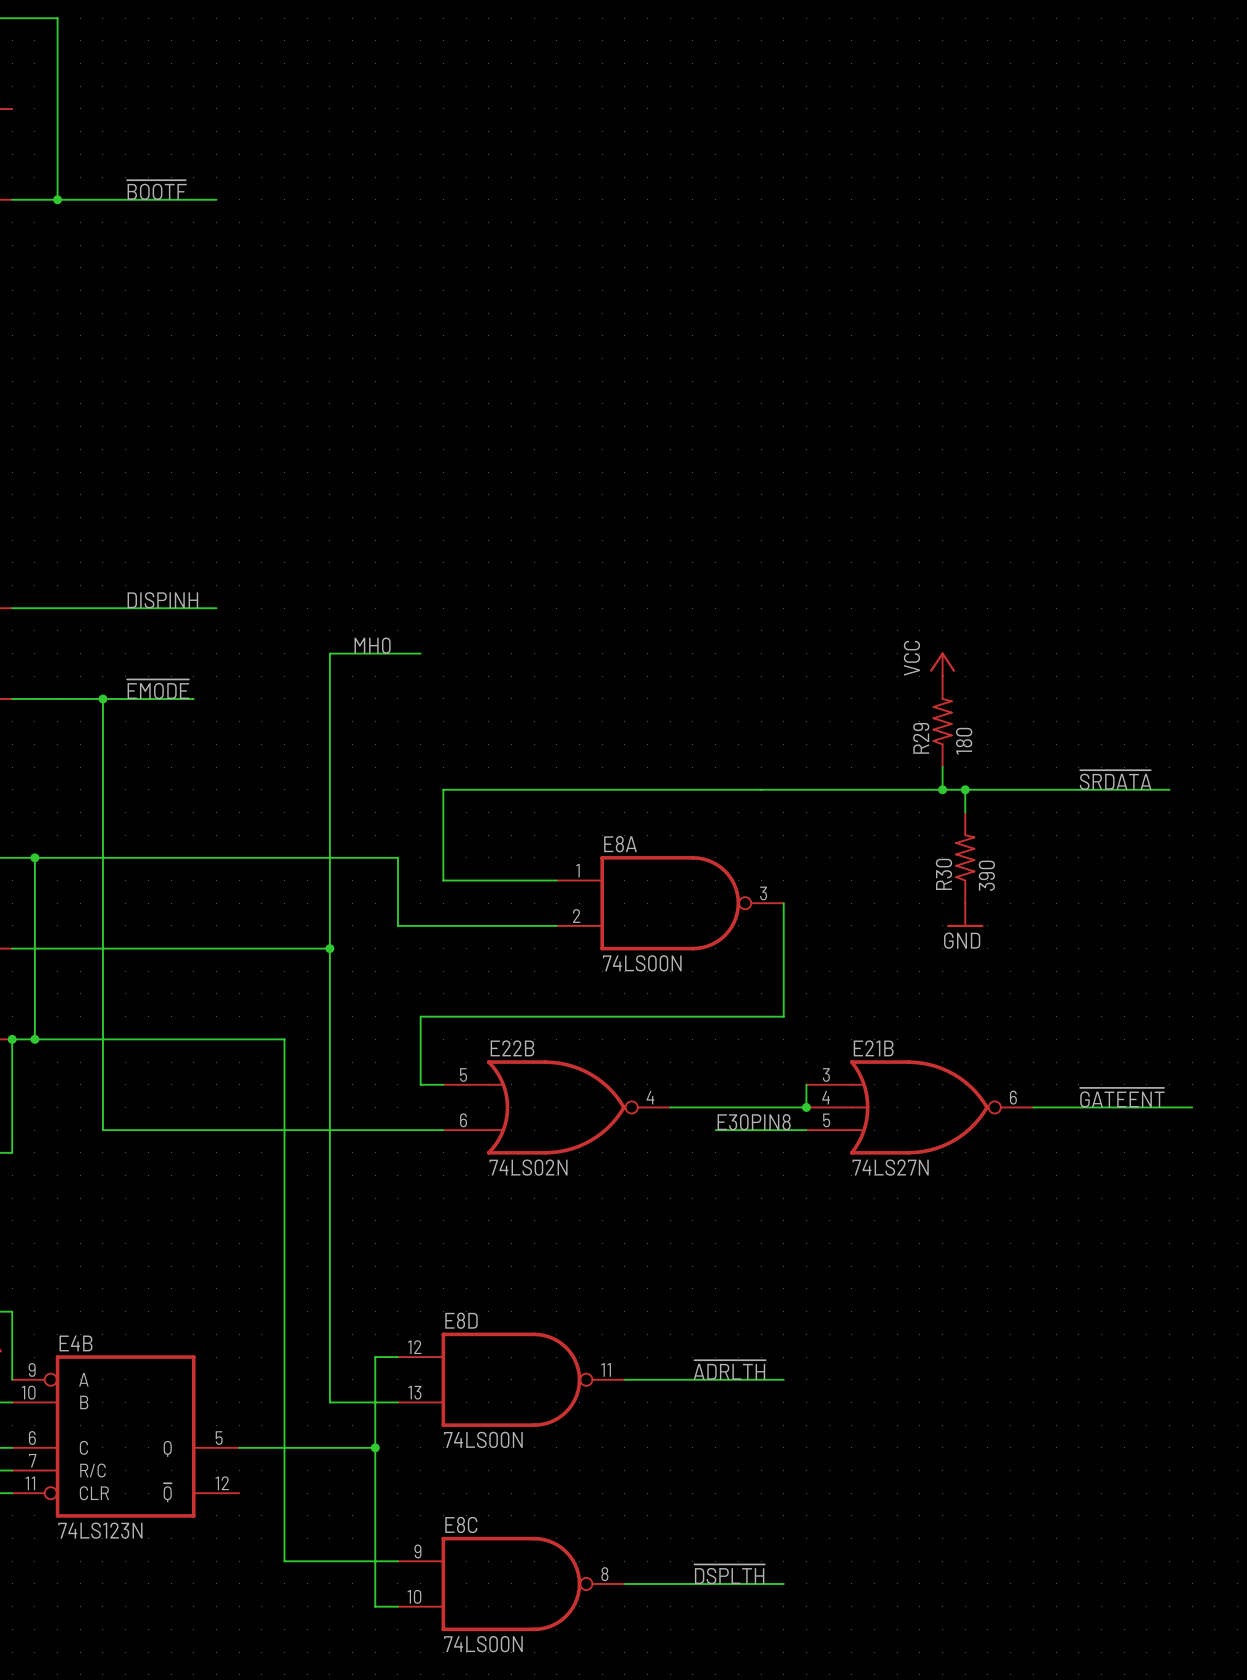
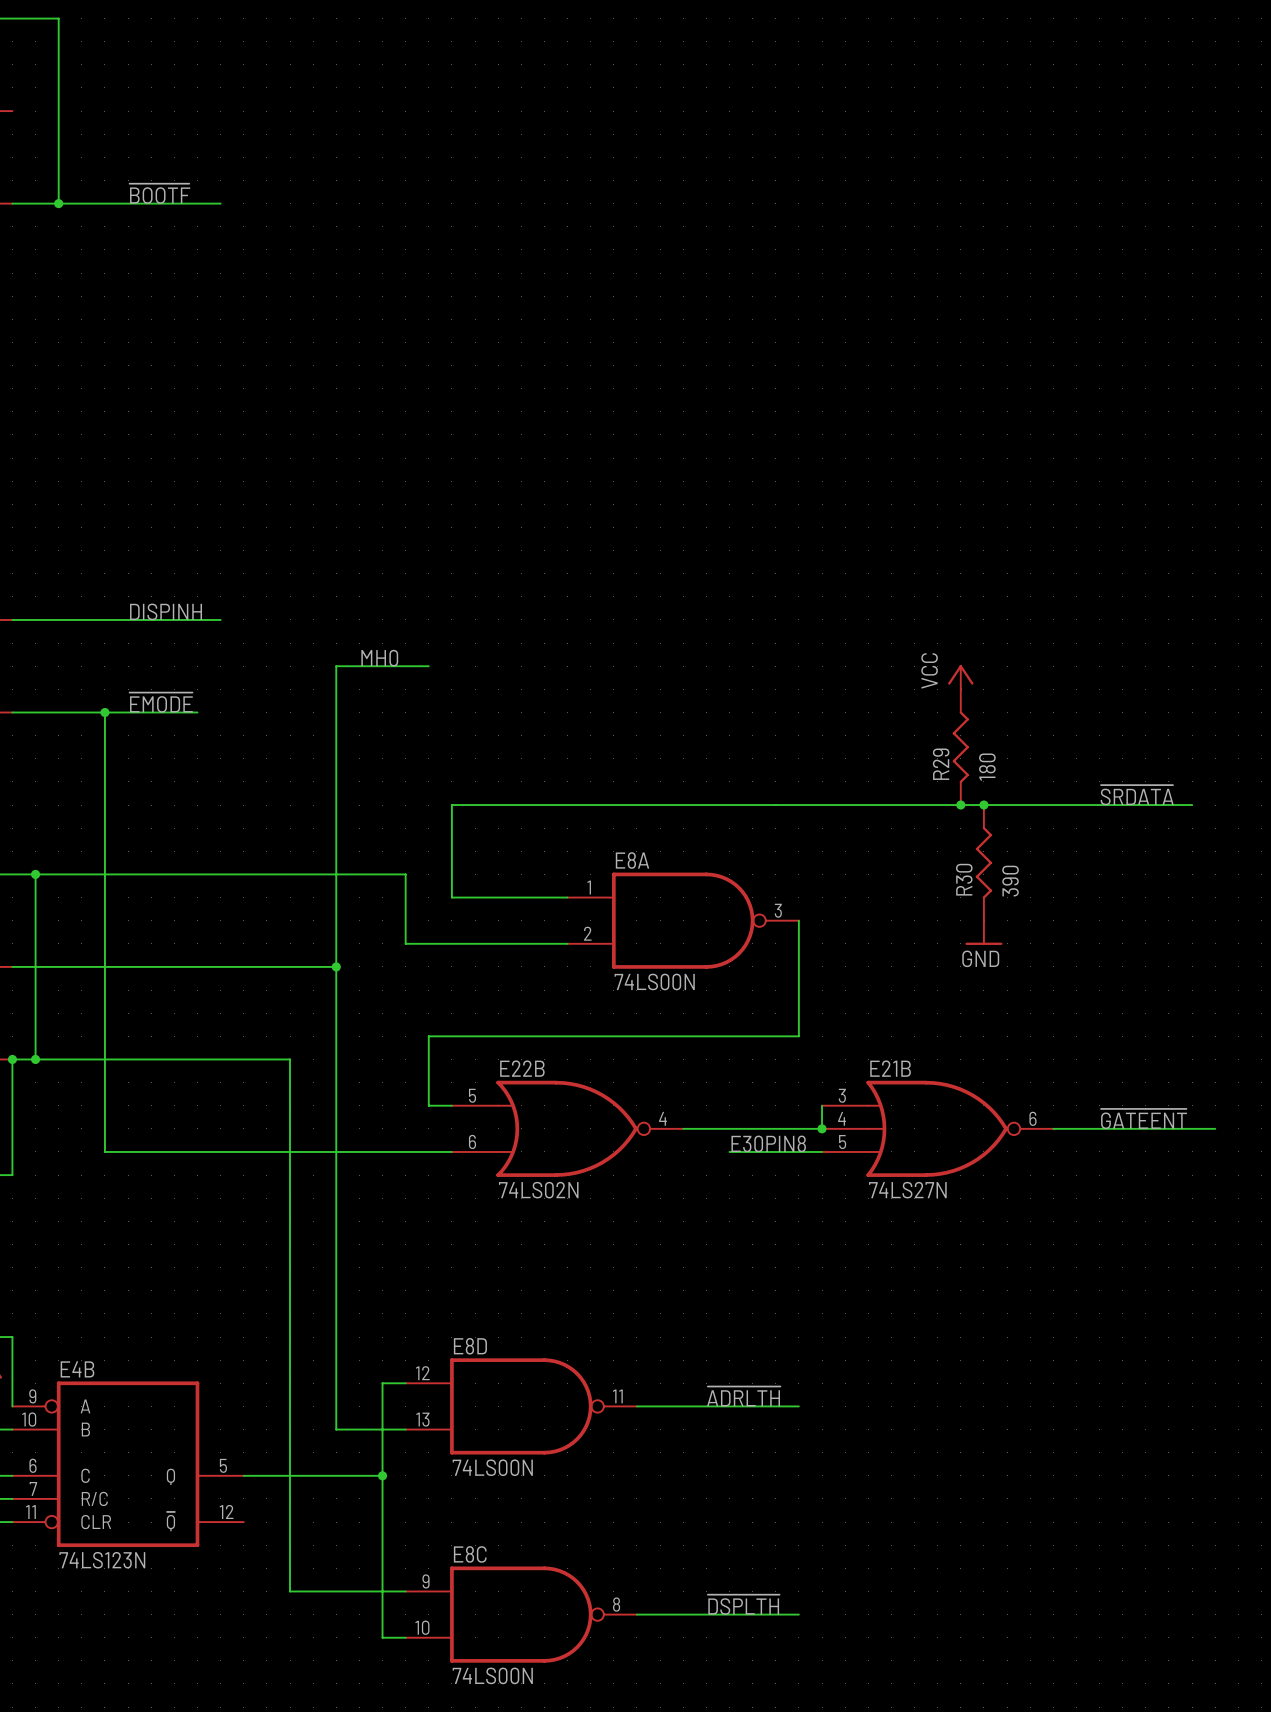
R29 symbol: [932, 676, 953, 768] -> [952, 689, 969, 806]
R30 symbol: [955, 812, 976, 904] -> [975, 805, 993, 921]

